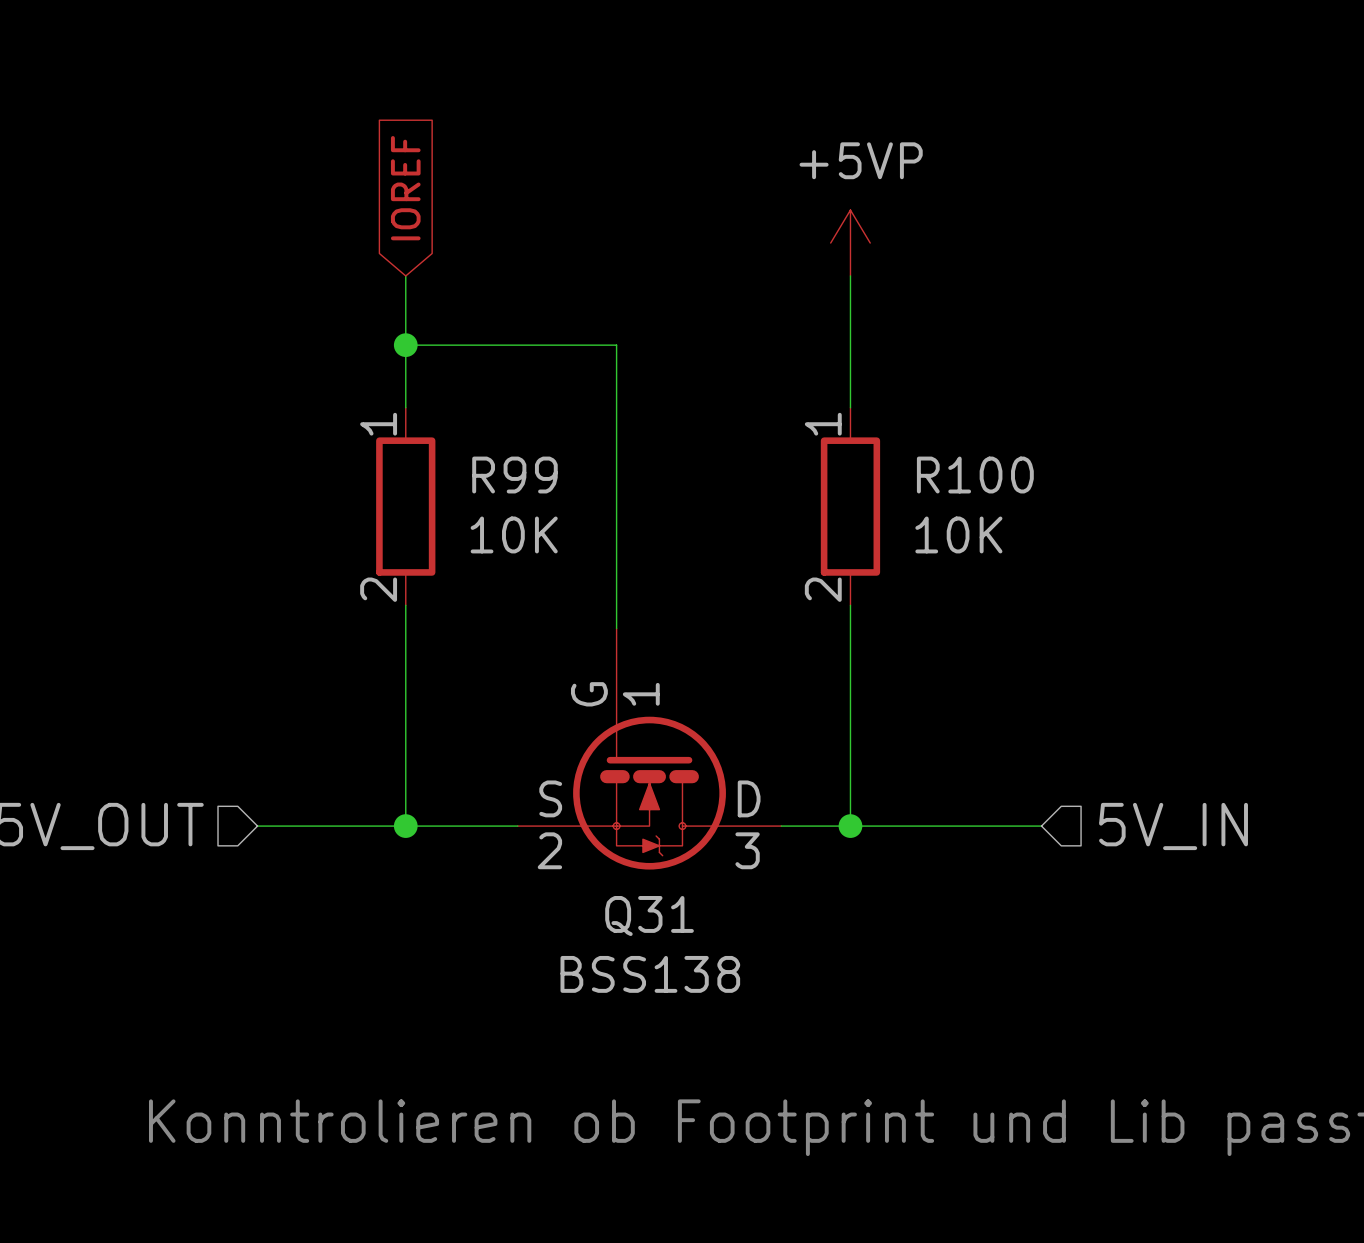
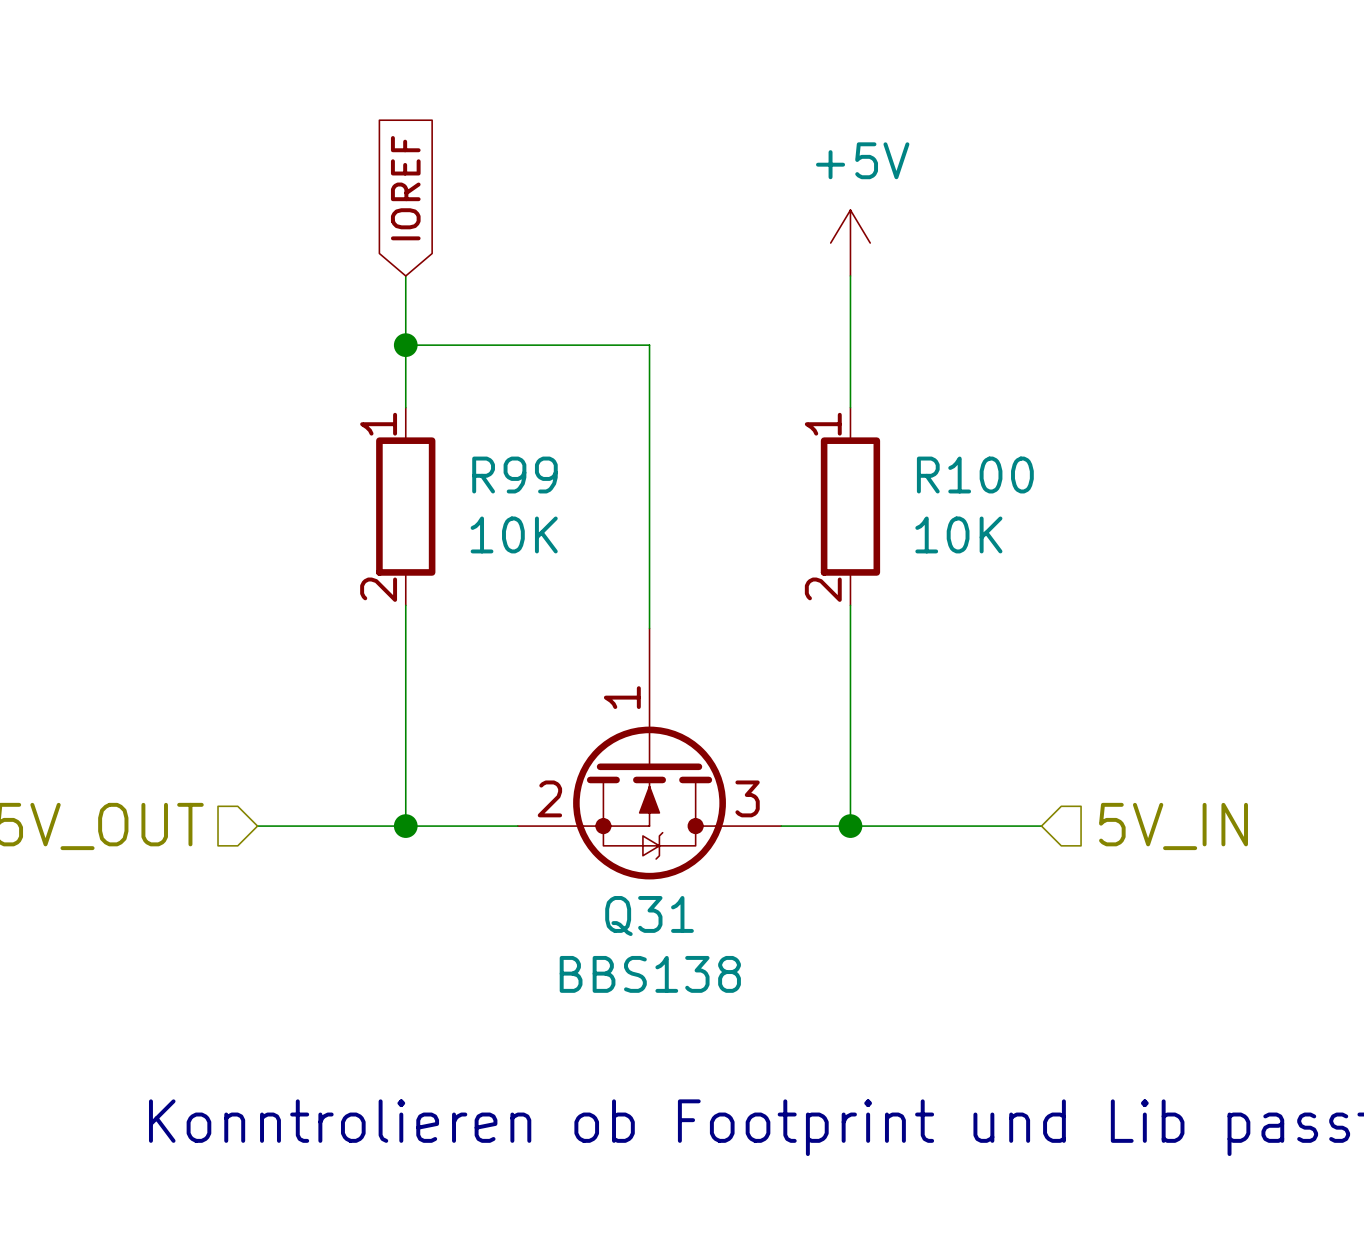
power symbol: +5VP (850, 243) -> +5V (850, 243)
wire: (616, 345) (616, 628) -> (616, 345) (649, 345) (649, 628)
Q31 symbol: [517, 628, 782, 870] -> [517, 628, 782, 880]
Q31 value: BSS138 (650, 974) -> BBS138 (650, 974)

